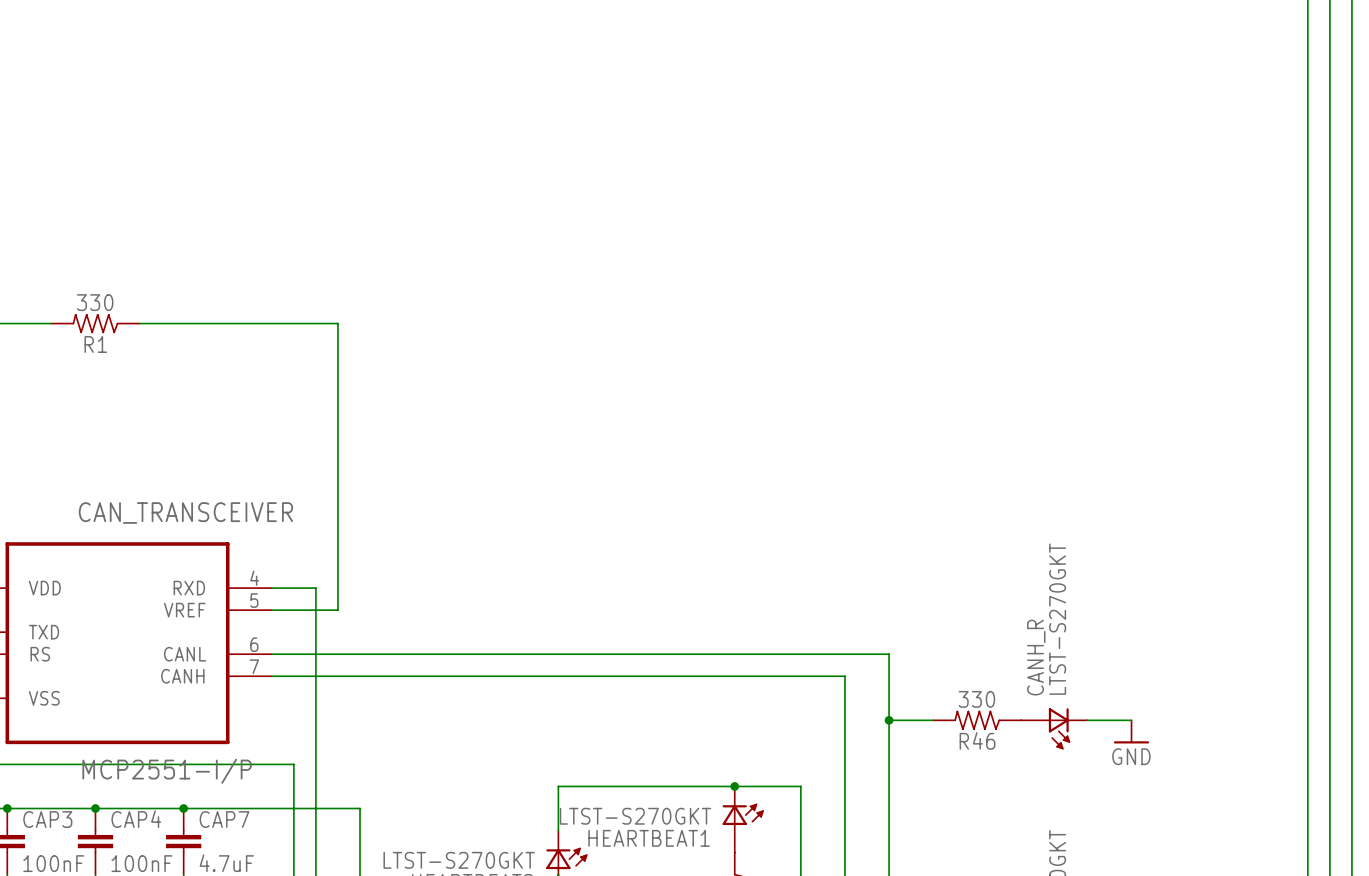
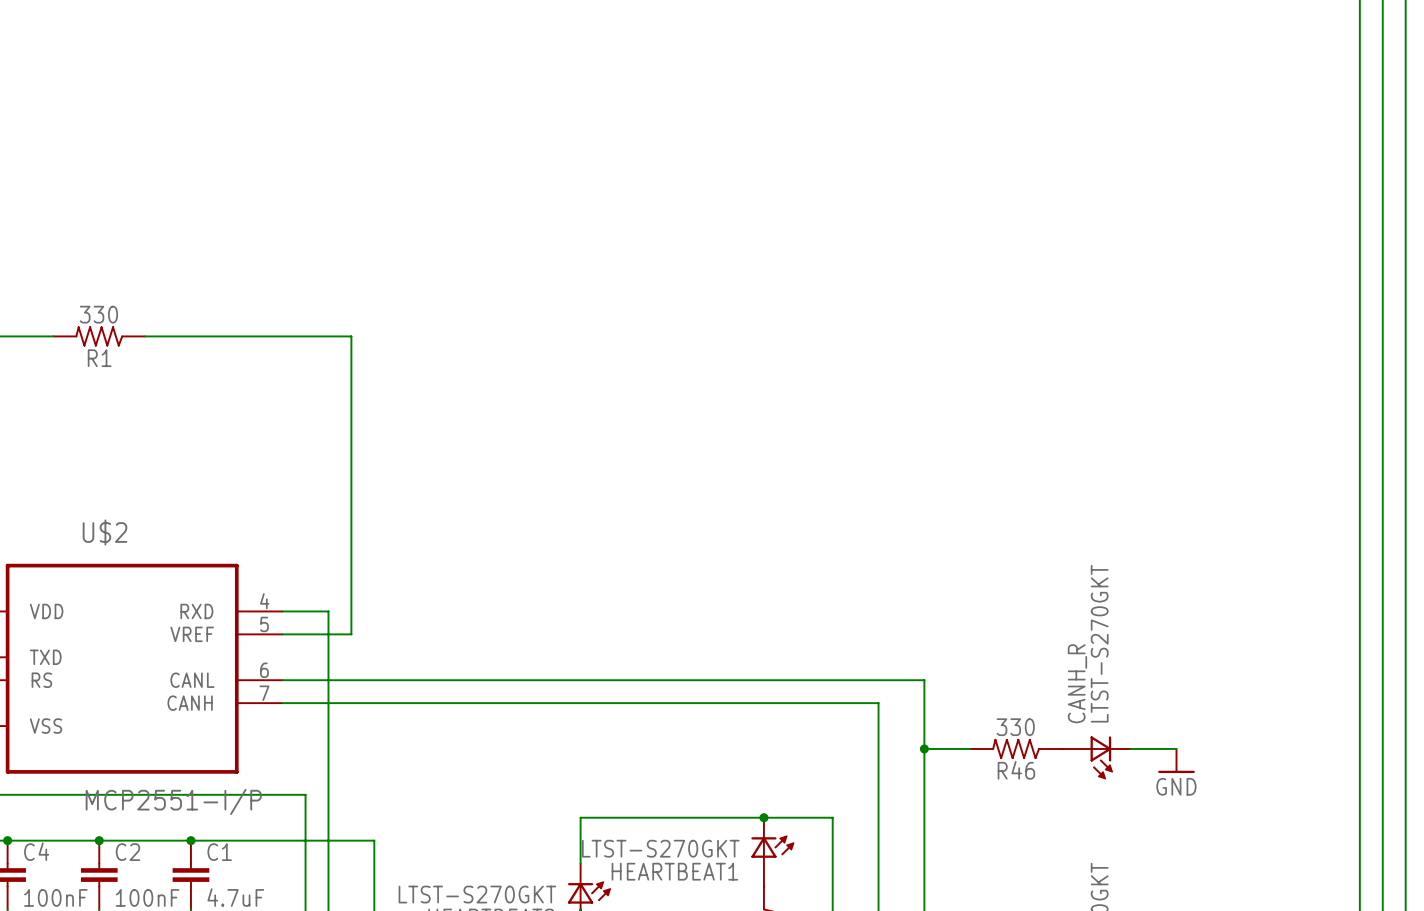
CAN_TRANSCEIVER name: CAN_TRANSCEIVER (185, 513) -> U$2 (105, 532)
CAP3 name: CAP3 (47, 819) -> C4 (36, 851)
CAP4 name: CAP4 (136, 819) -> C2 (127, 852)
CAP7 name: CAP7 (224, 819) -> C1 (219, 852)

